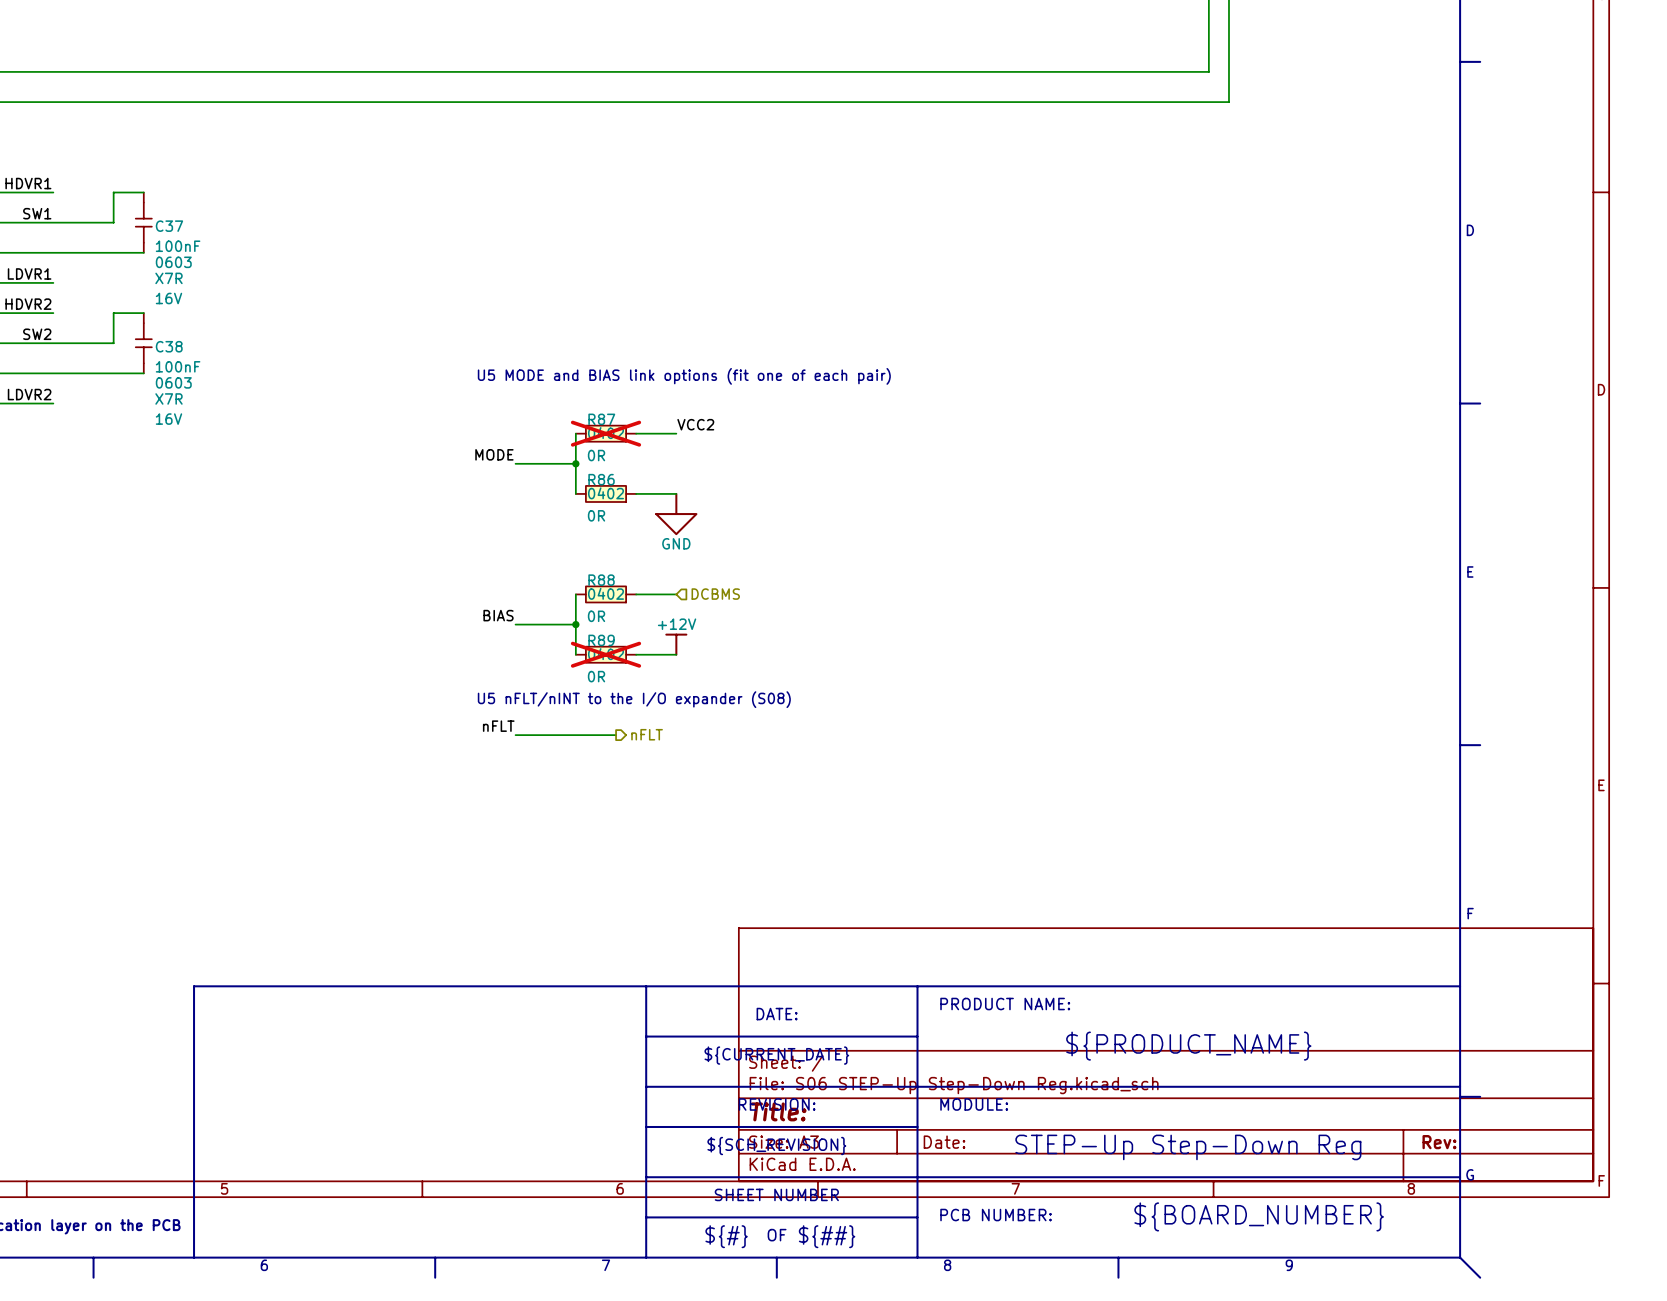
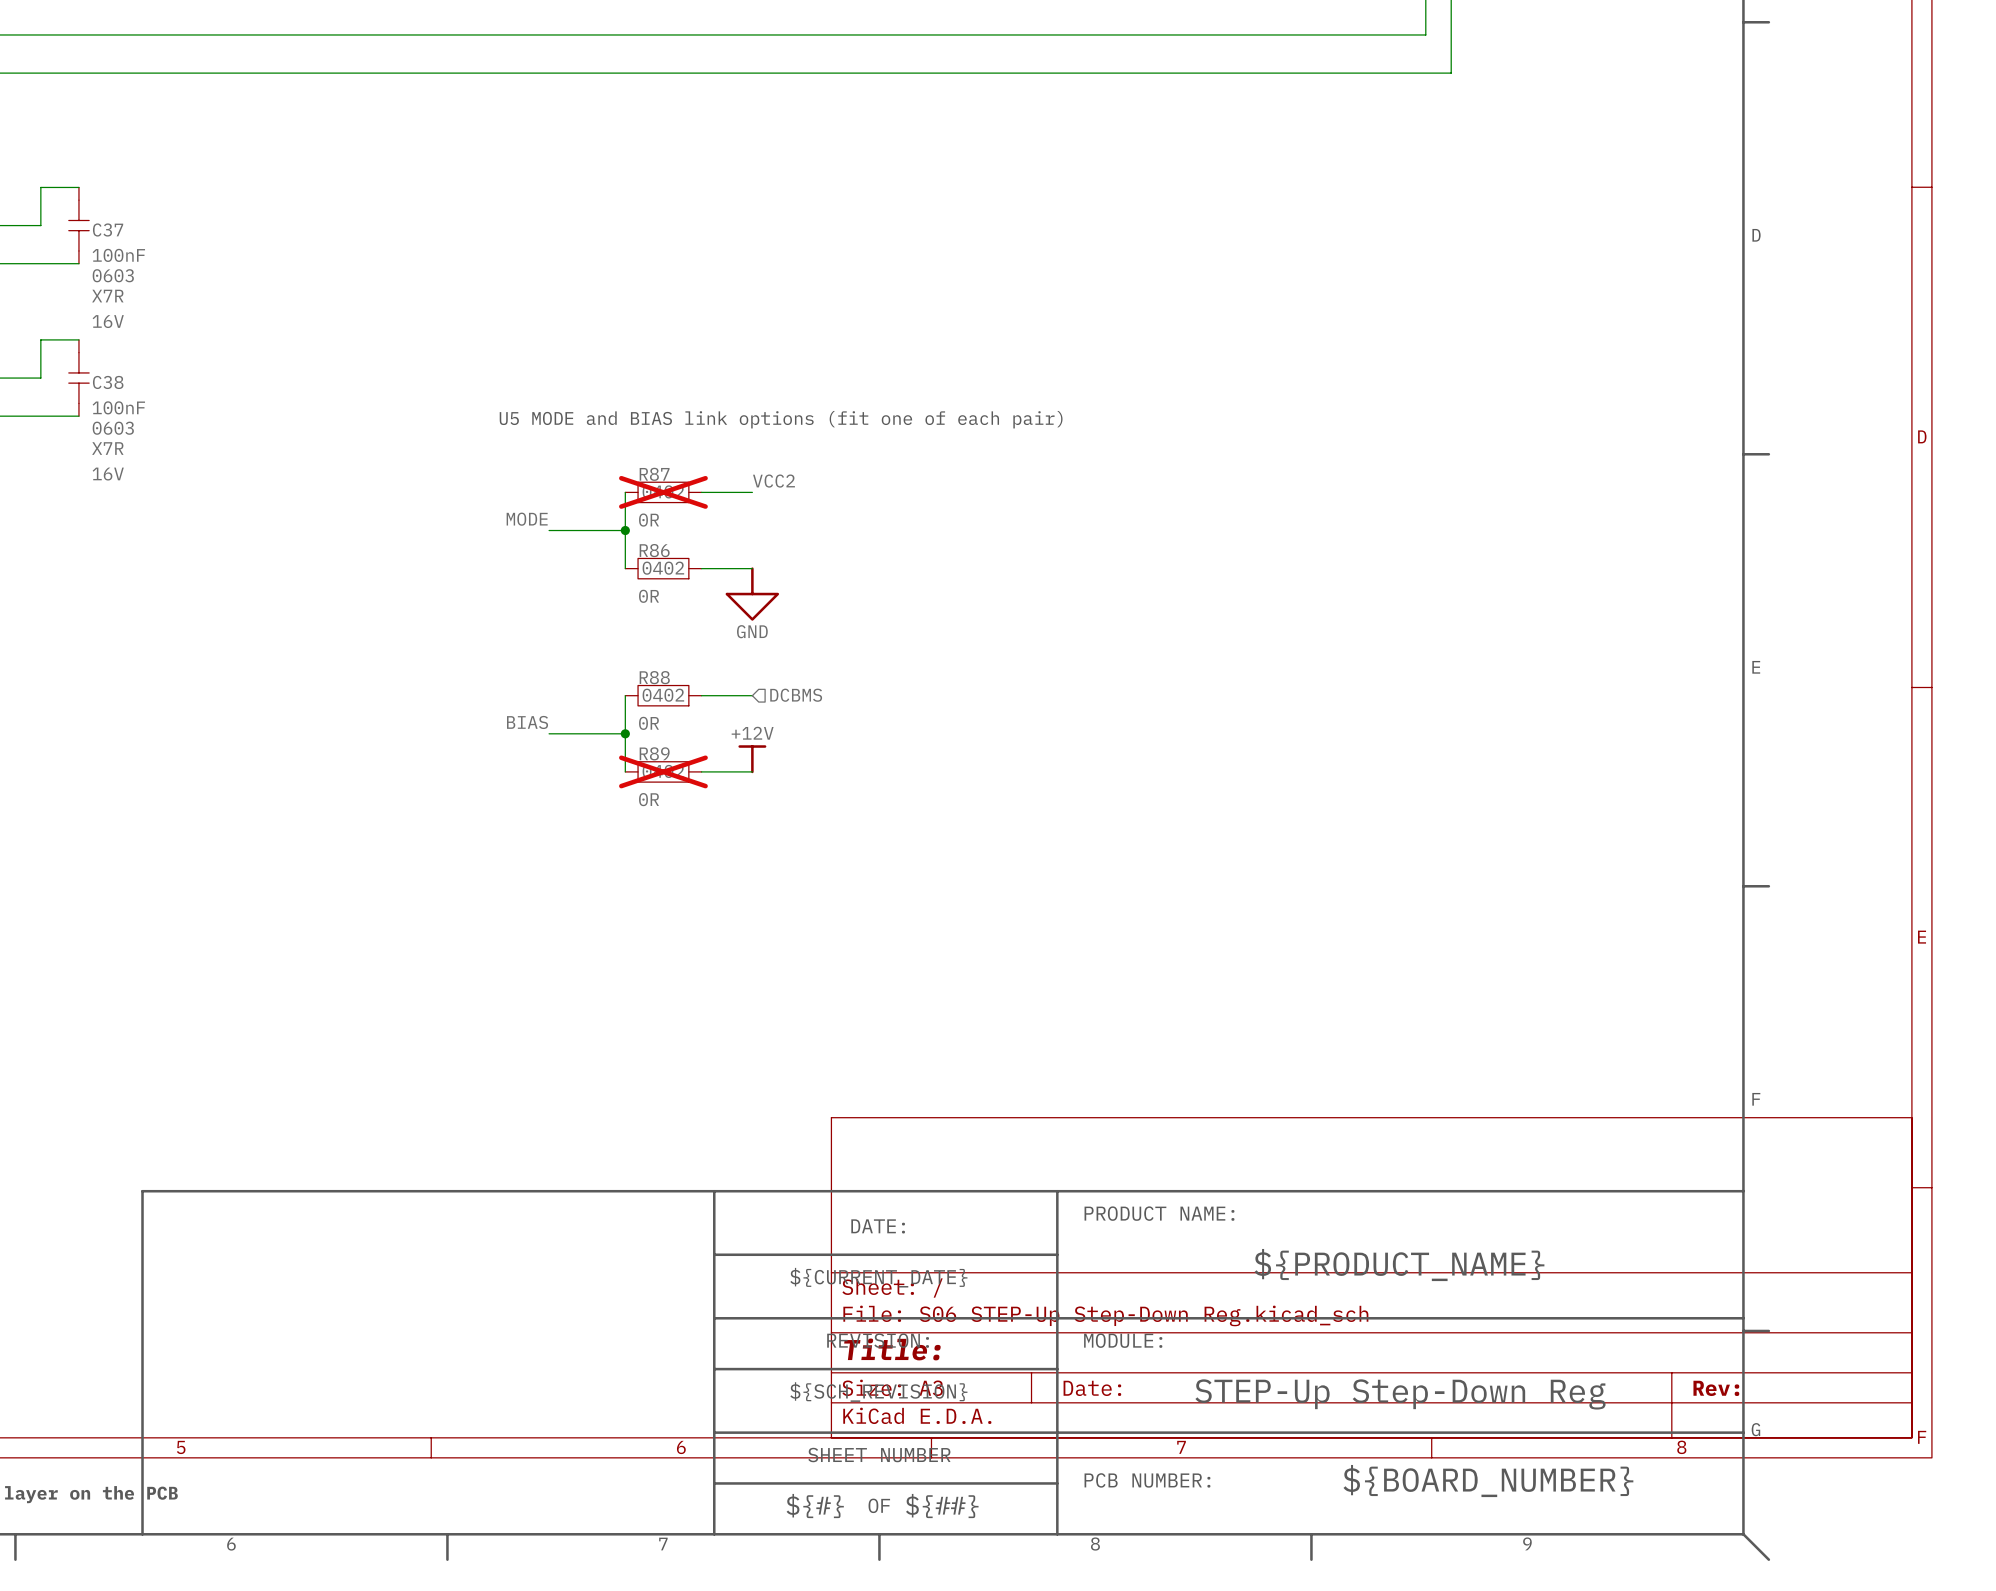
text: U5 nFLT/nINT to the I/O expander (S08) (634, 699) -> none
label: nFLT (498, 726) -> none
hierarchical label: nFLT (647, 734) -> none
wire: (515, 735) (616, 735) -> none

